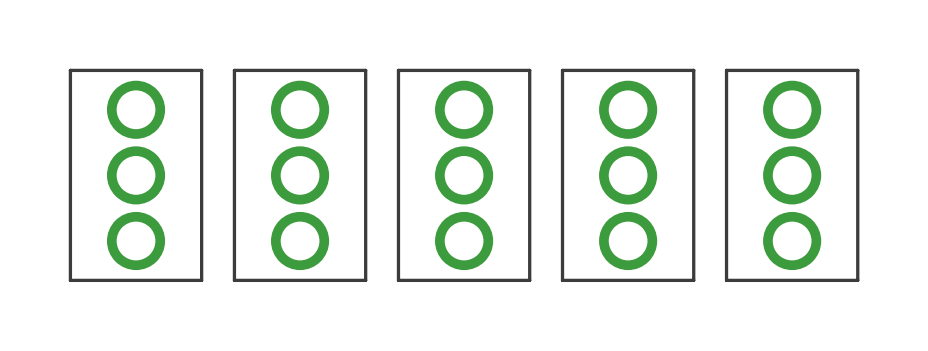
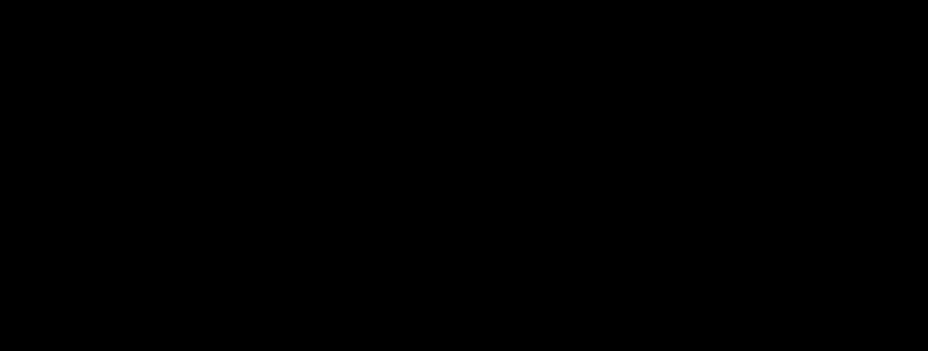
part: (136, 175) -> none
part: (300, 175) -> none
part: (464, 175) -> none
part: (628, 175) -> none
part: (792, 175) -> none

